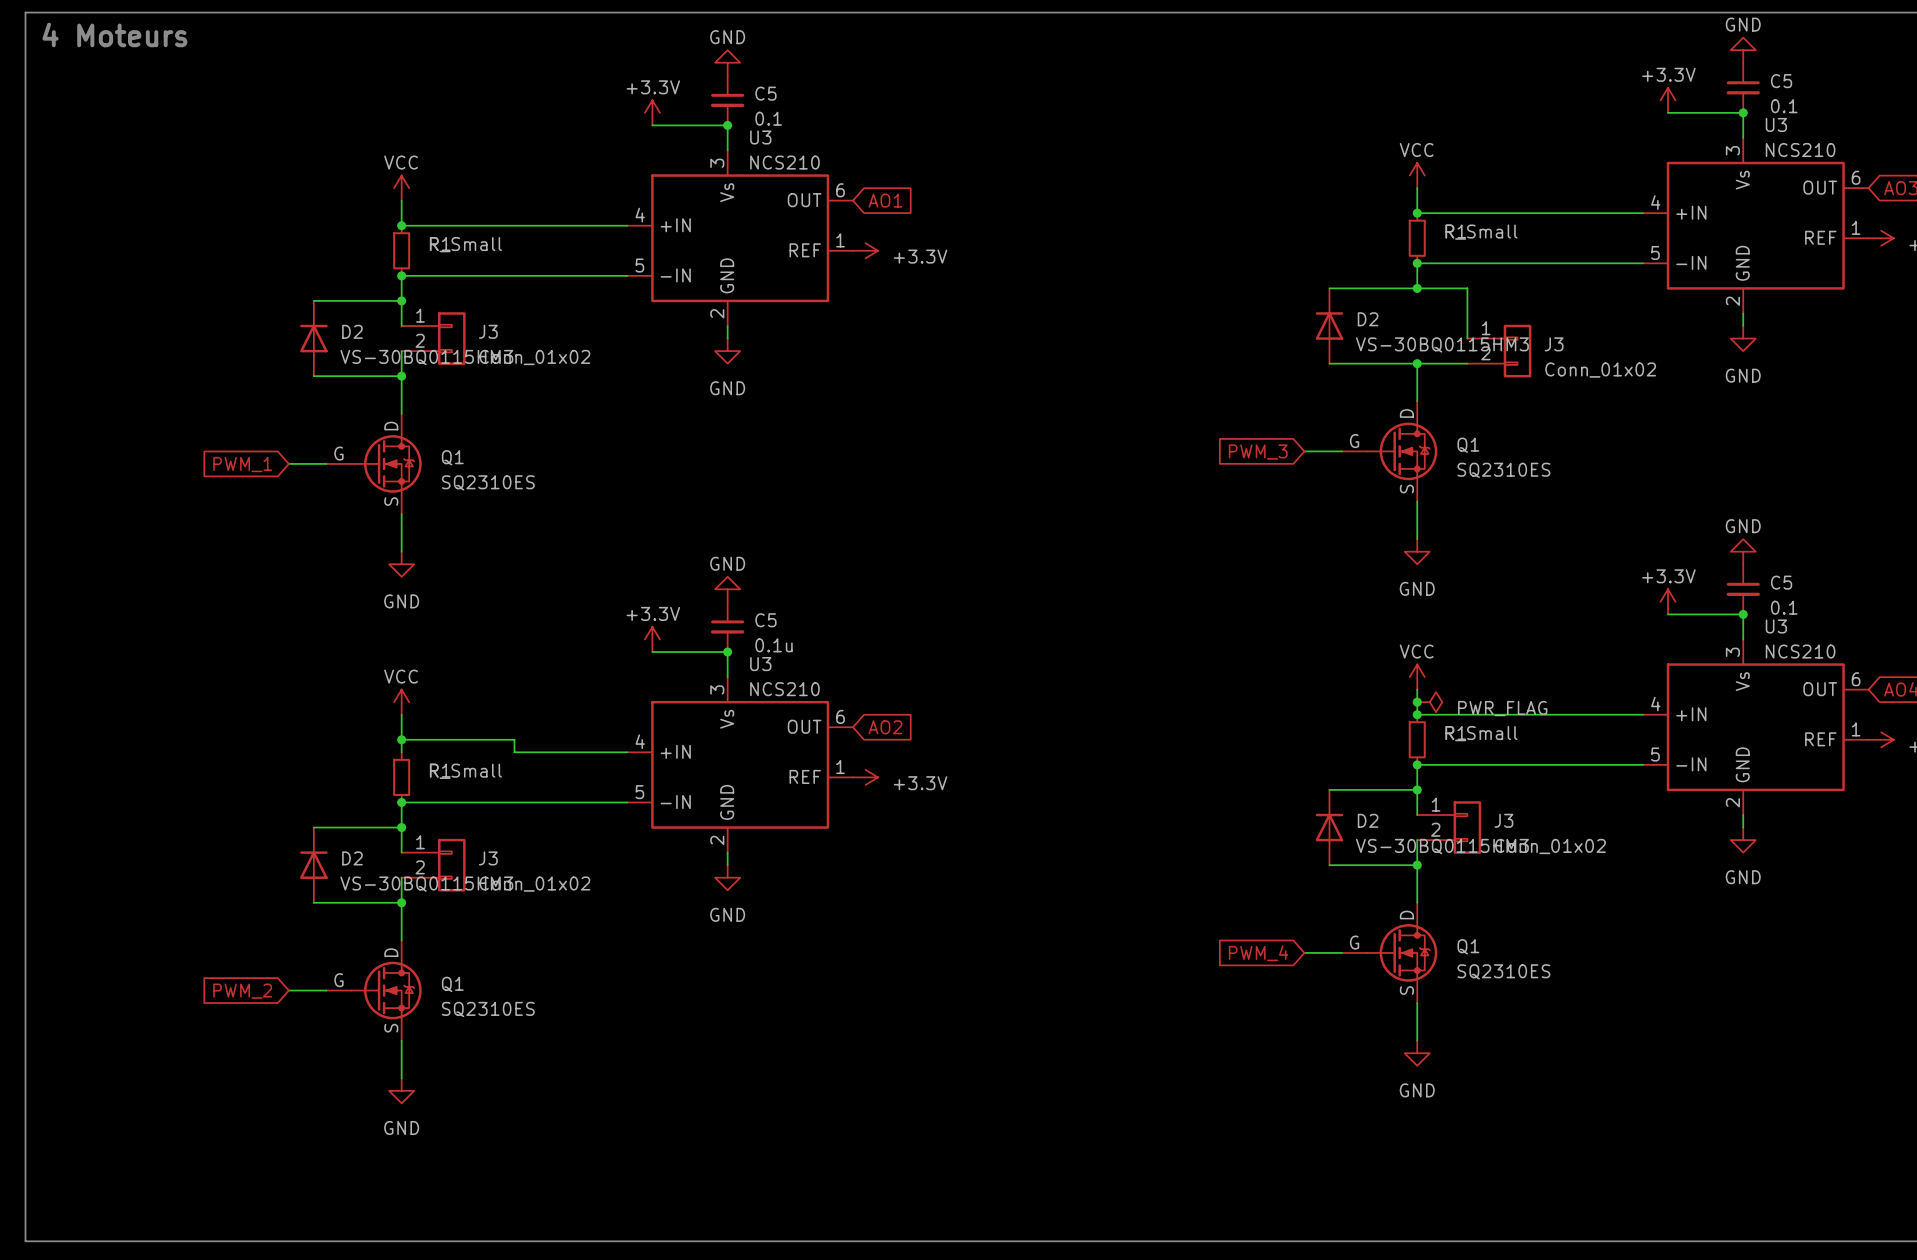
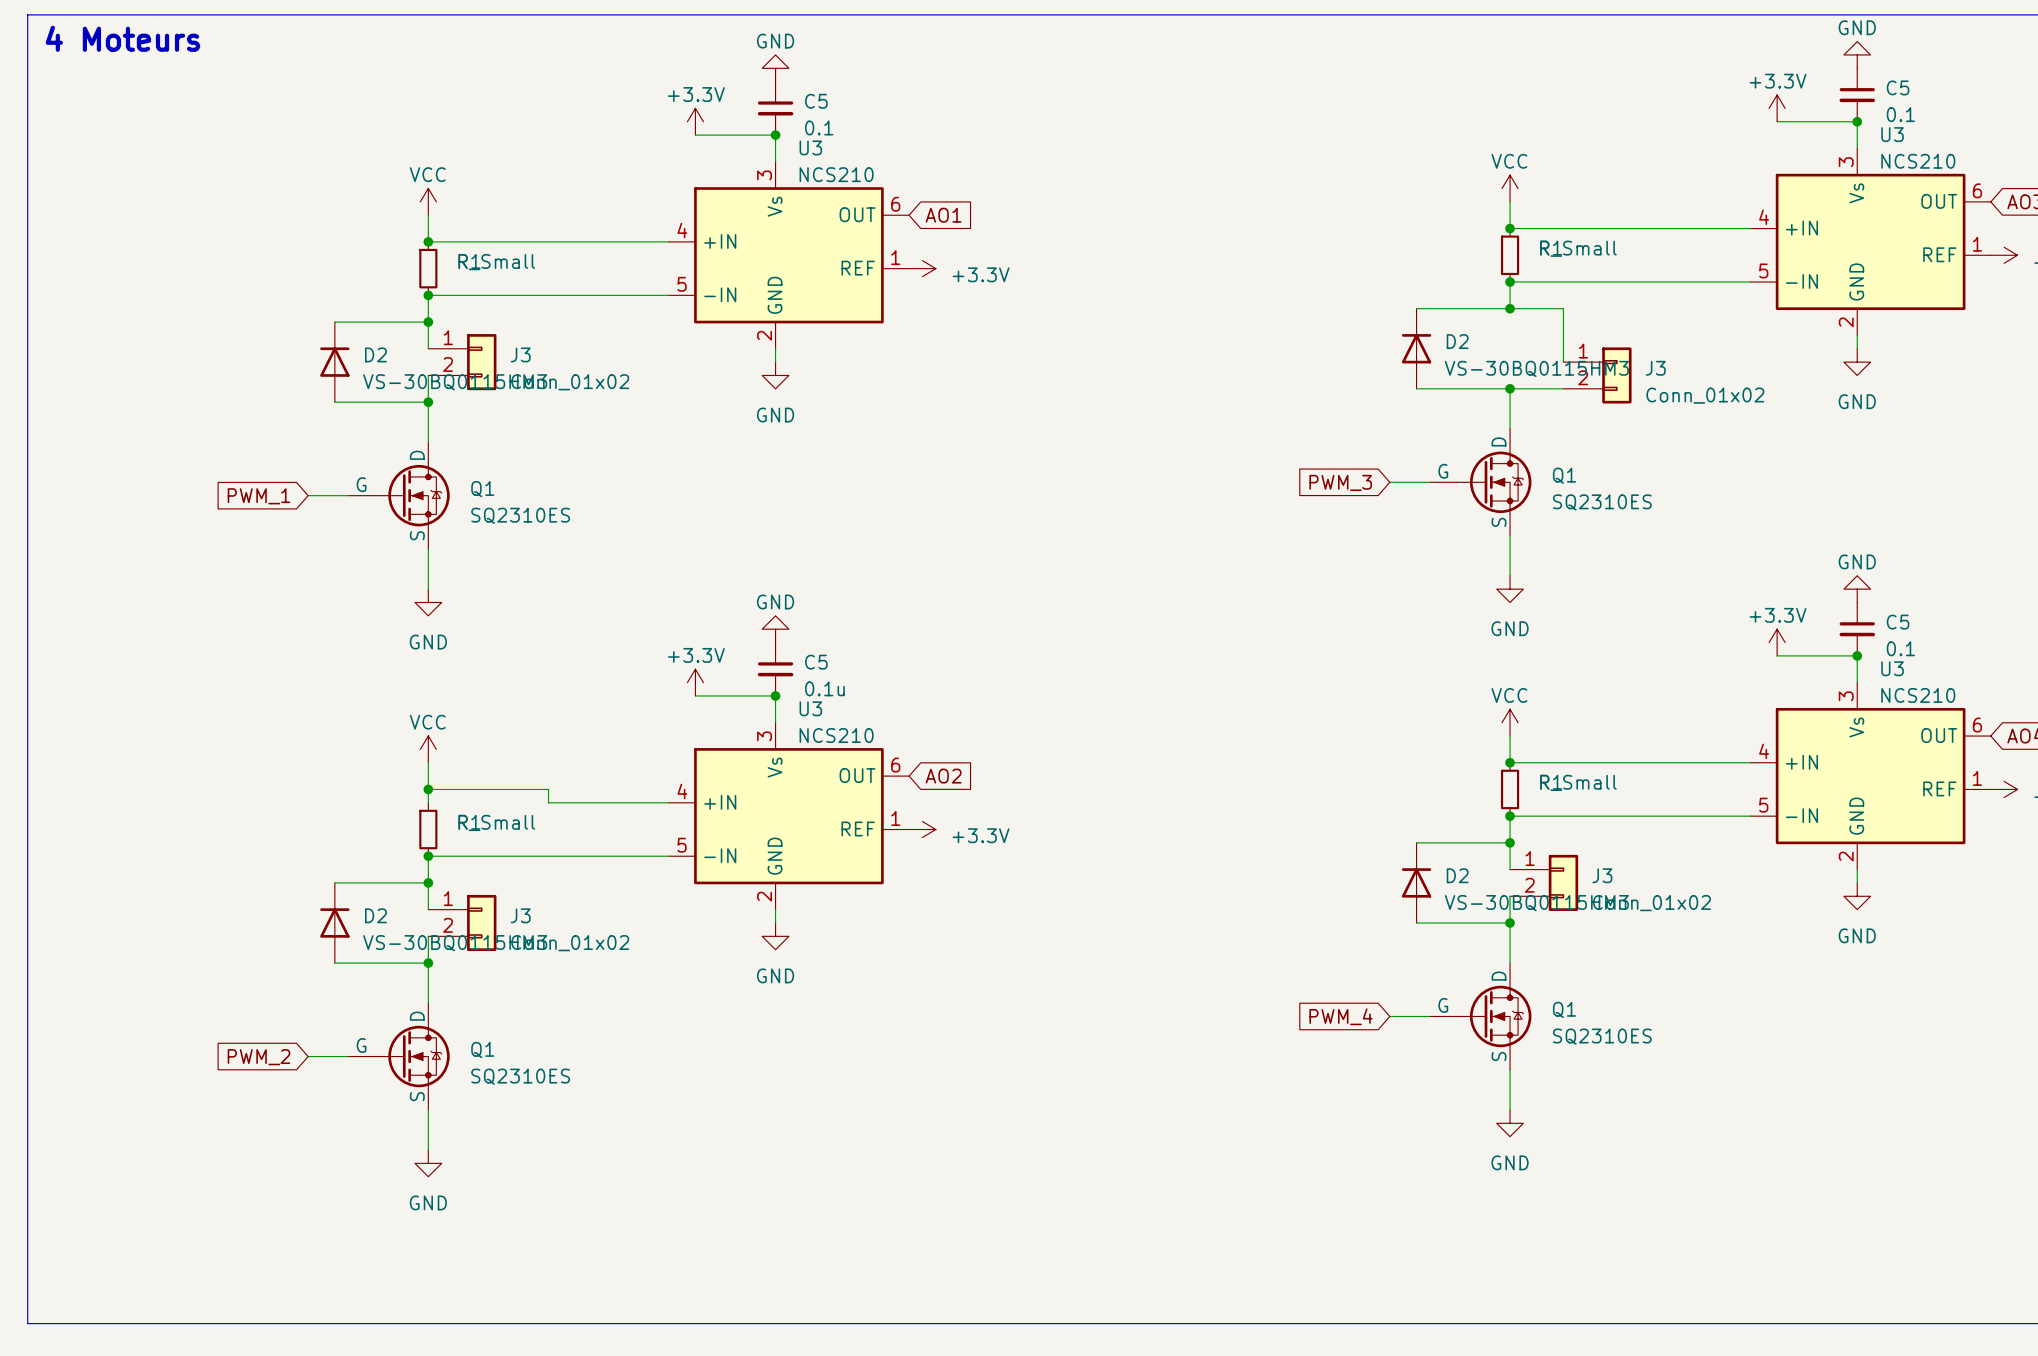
junction: (1417, 702) -> none
power symbol: PWR_FLAG (1429, 702) -> none

